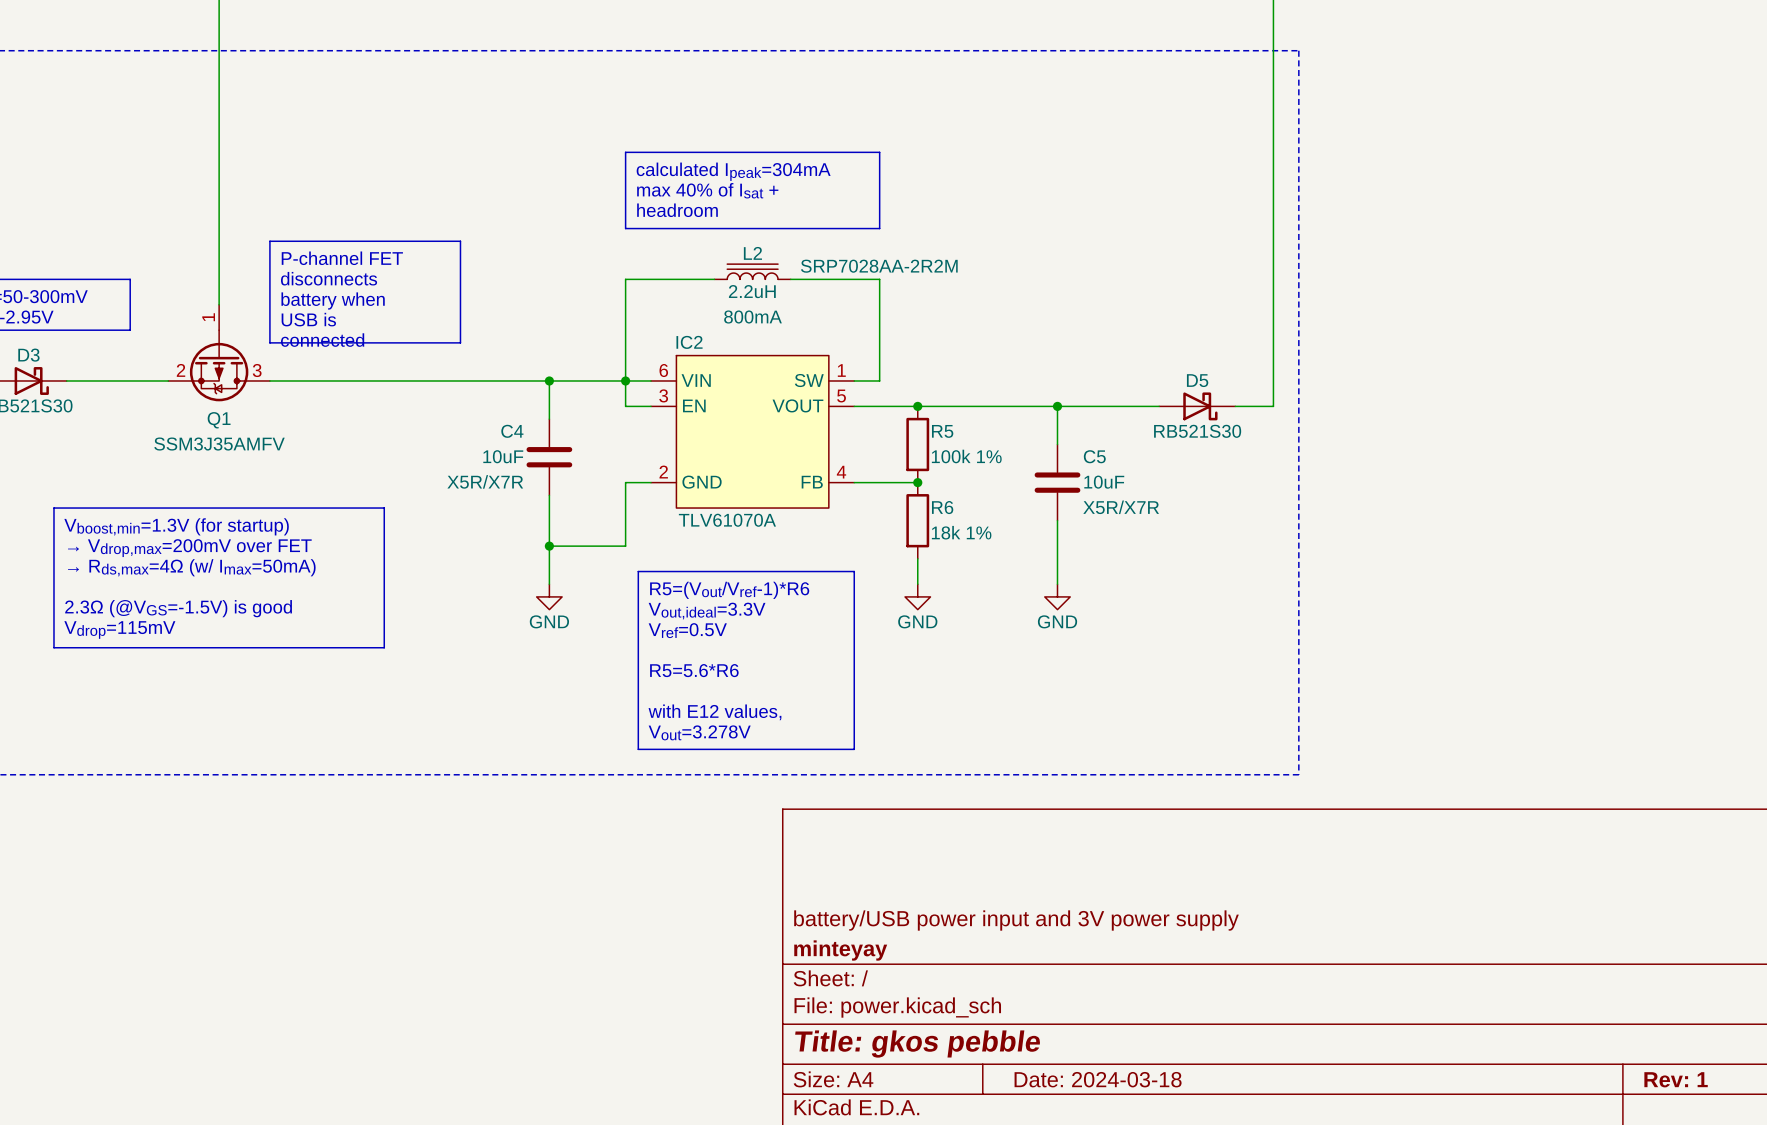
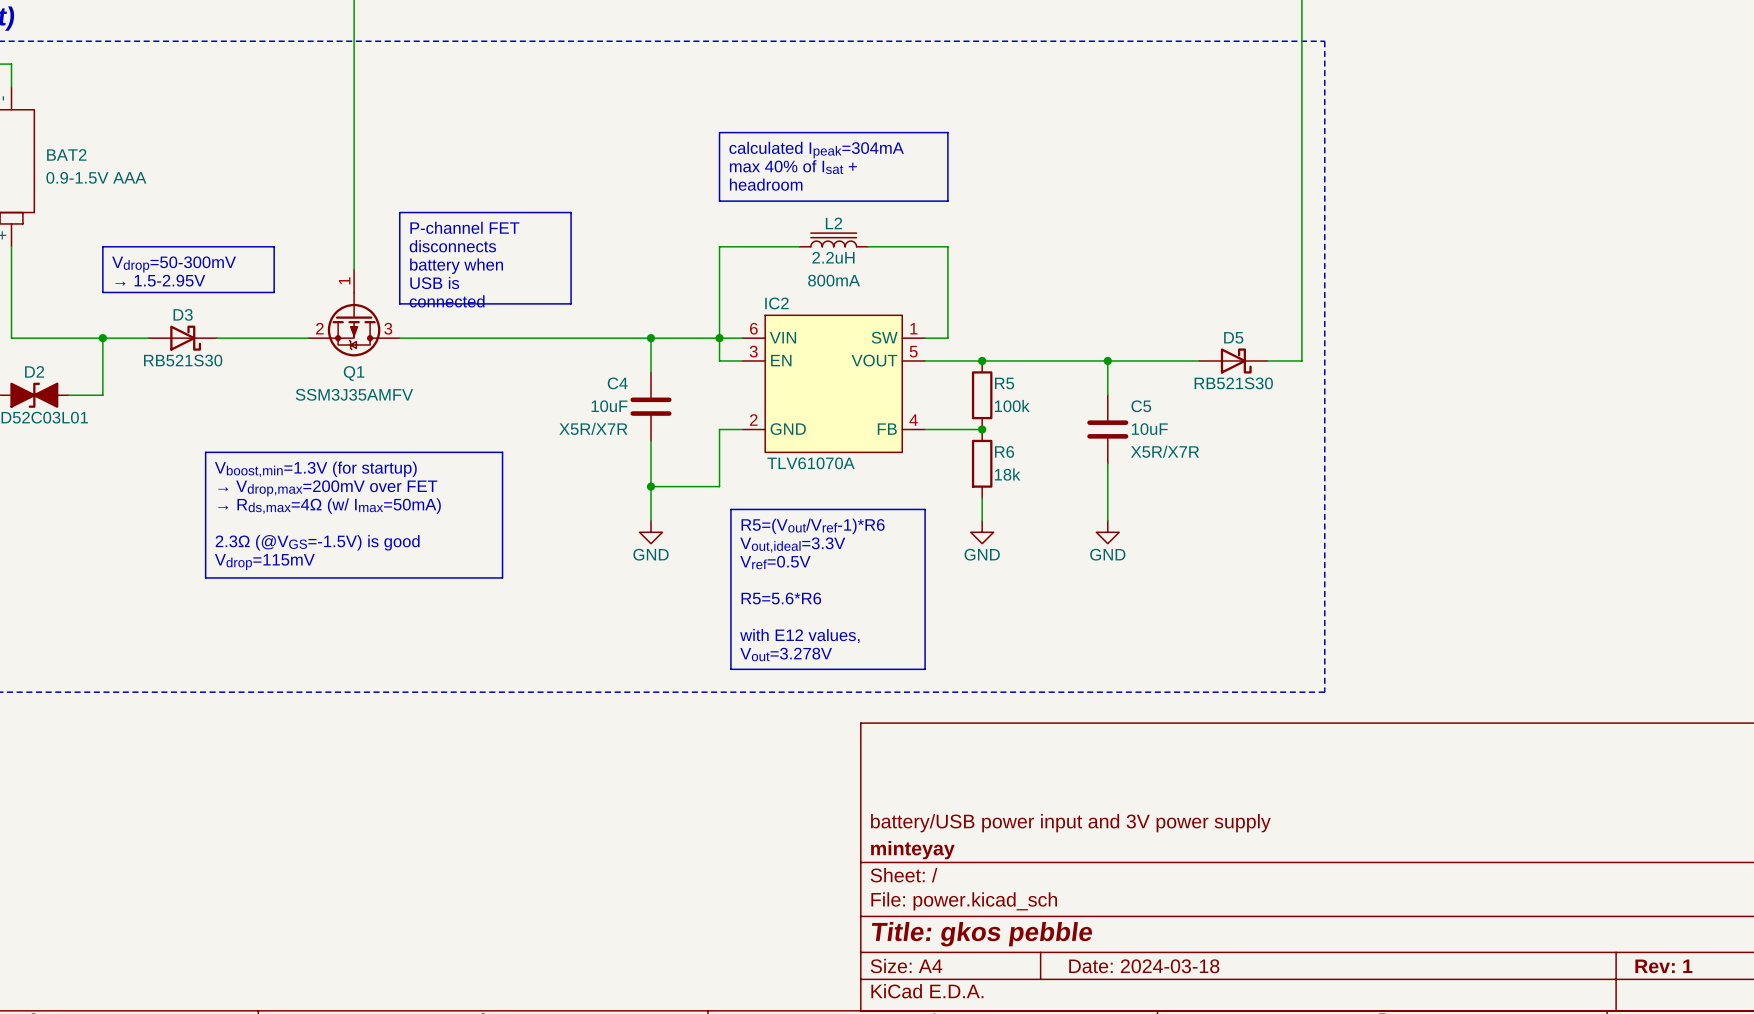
L2 text: SRP7028AA-2R2M (879, 266) -> none
R5 value: 100k 1% (966, 456) -> 100k (1012, 406)
R6 value: 18k 1% (961, 532) -> 18k (1007, 474)

